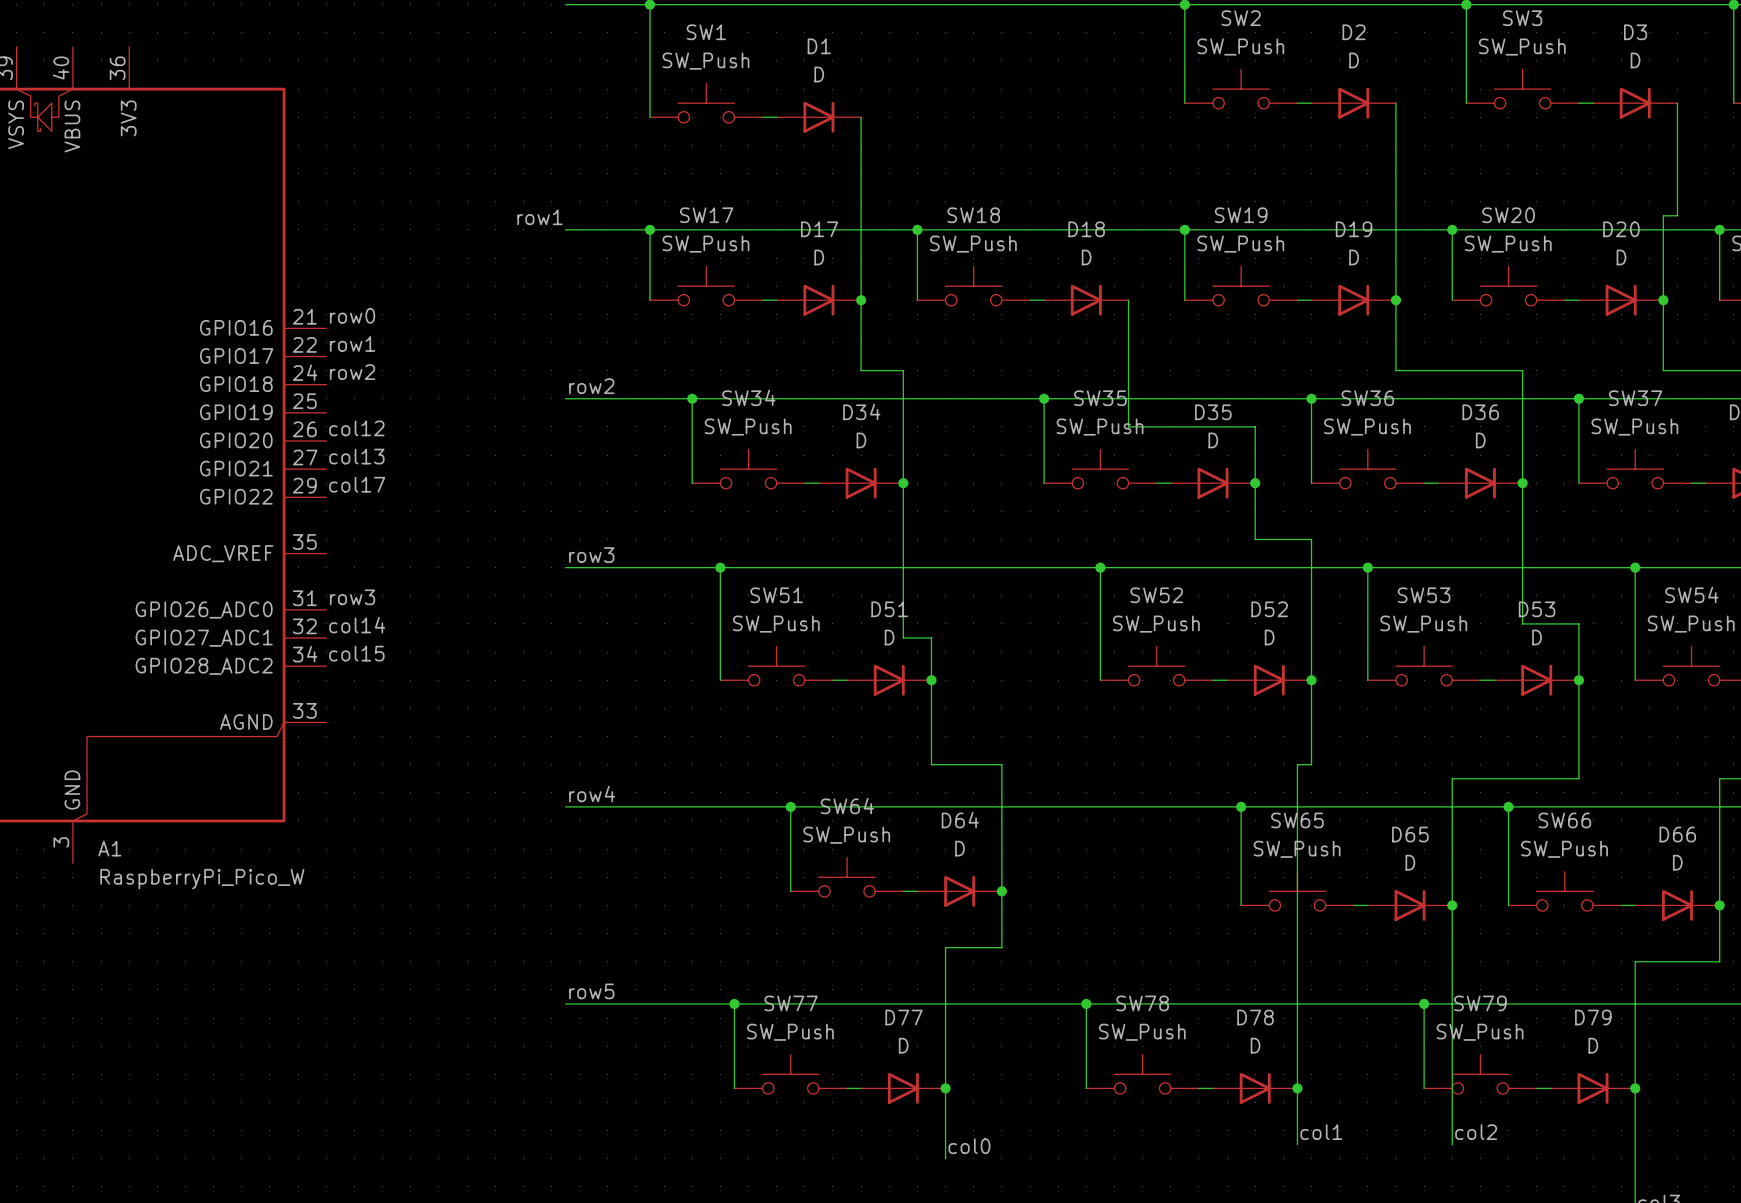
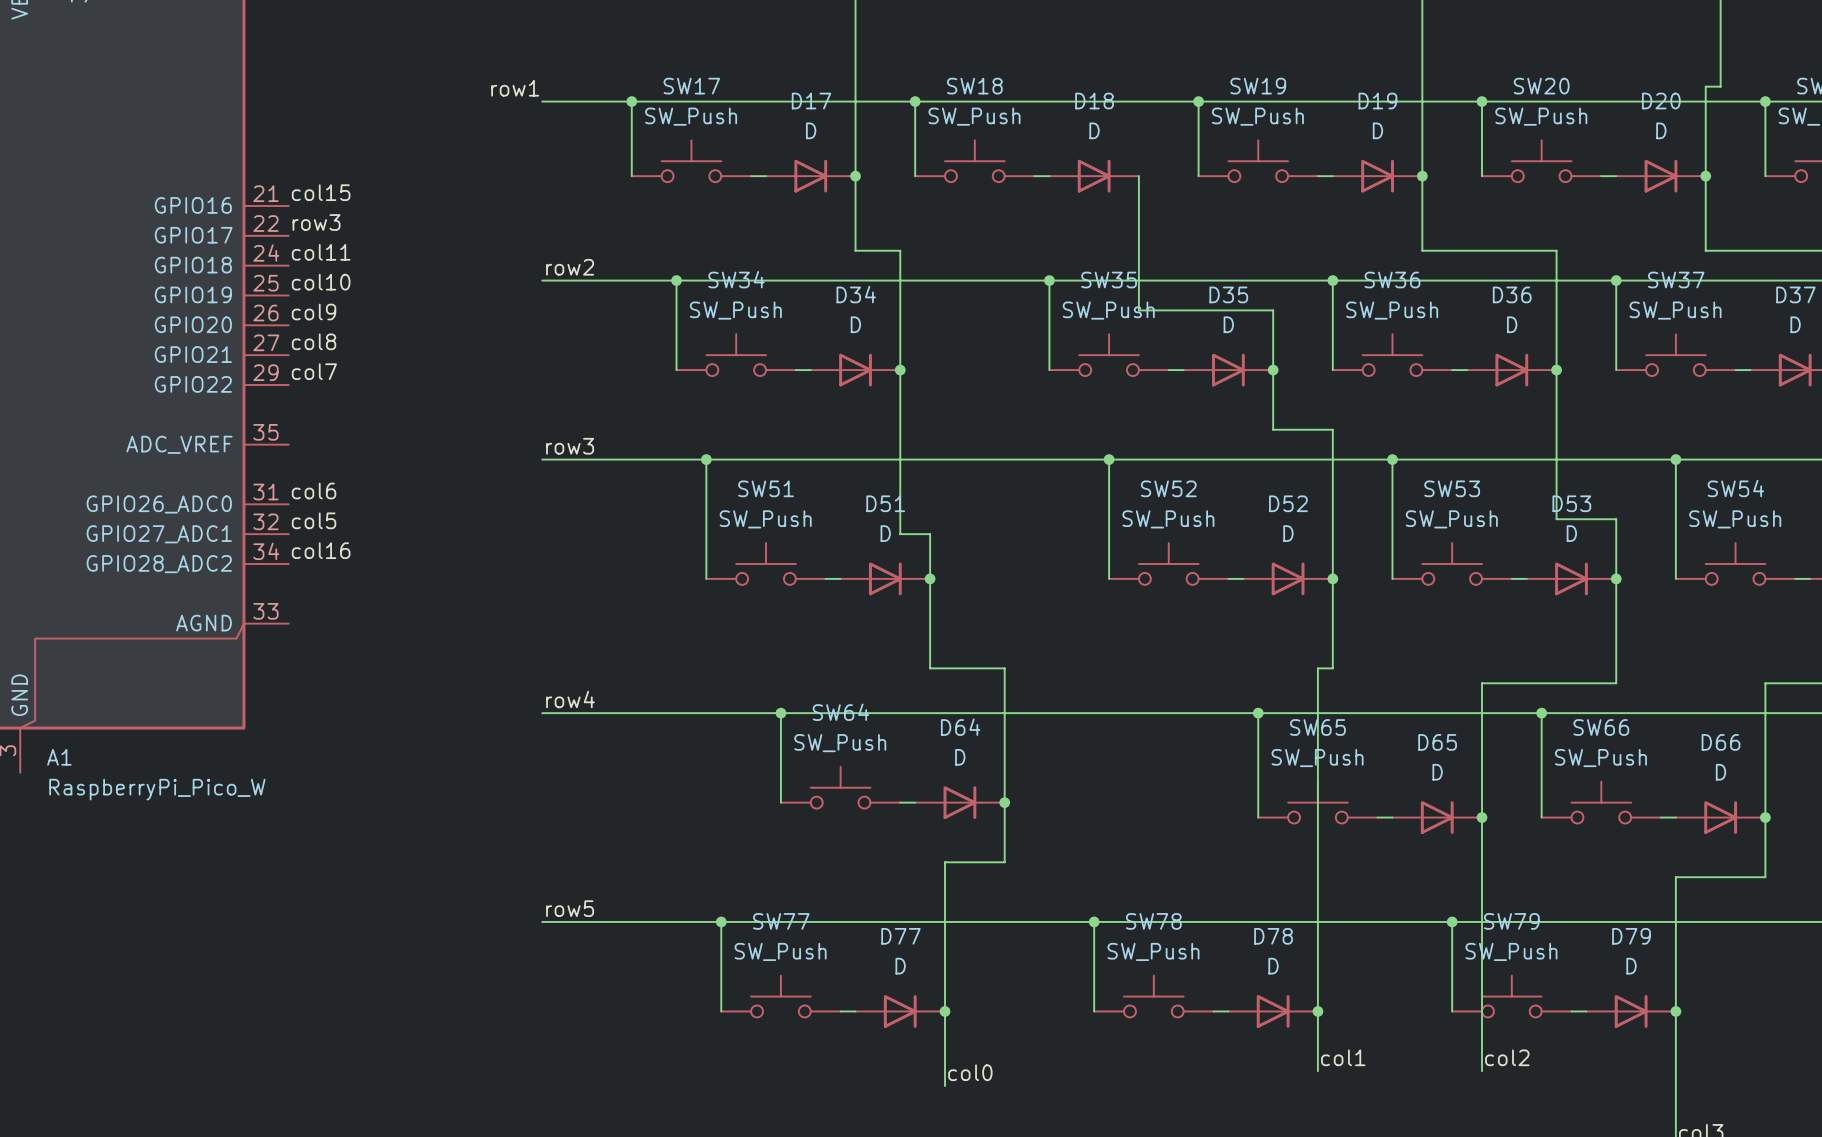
label: row0 (352, 315) -> col15 (321, 192)
label: row1 (352, 343) -> row3 (316, 222)
label: row2 (352, 372) -> col11 (321, 252)
label: none -> col10 (321, 282)
label: col12 (356, 428) -> col9 (314, 312)
label: col13 (356, 456) -> col8 (314, 341)
label: col17 (357, 484) -> col7 (314, 371)
label: row3 (352, 597) -> col6 (314, 491)
label: col14 (357, 625) -> col5 (314, 520)
label: col15 (356, 653) -> col16 (321, 550)

